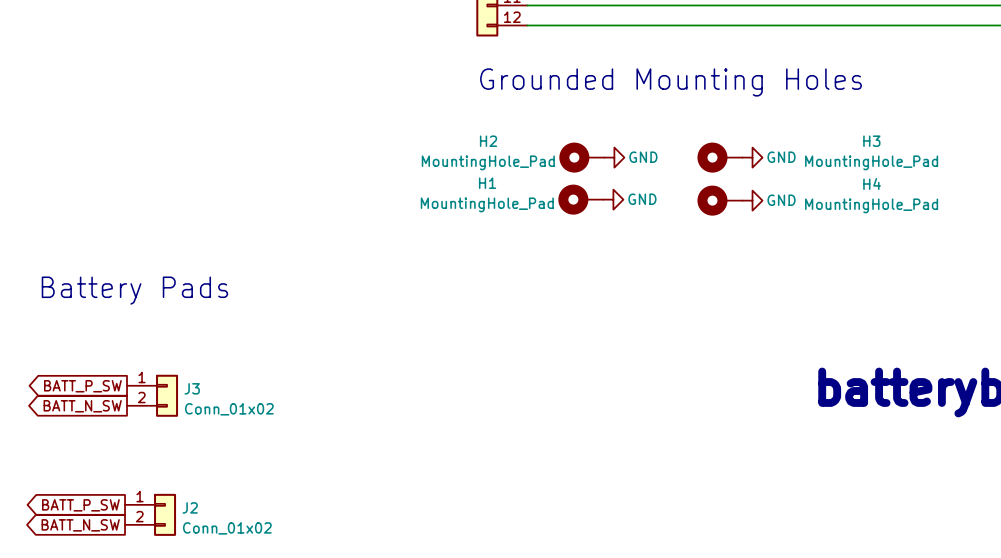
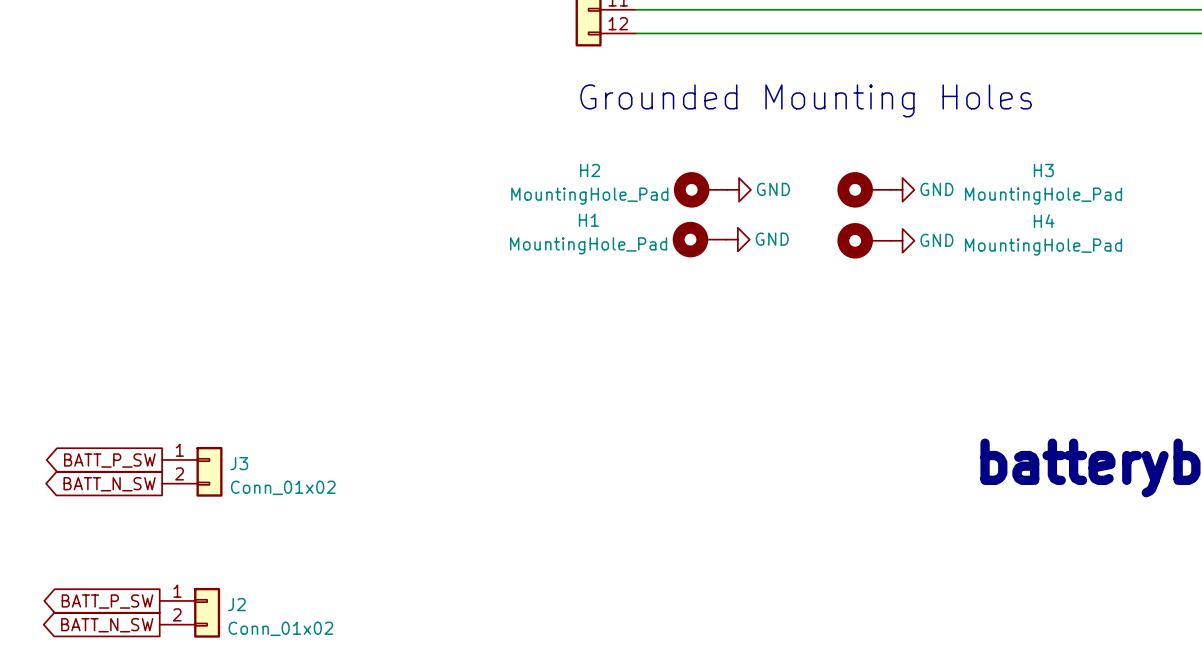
text: Battery Pads (134, 290) -> none

